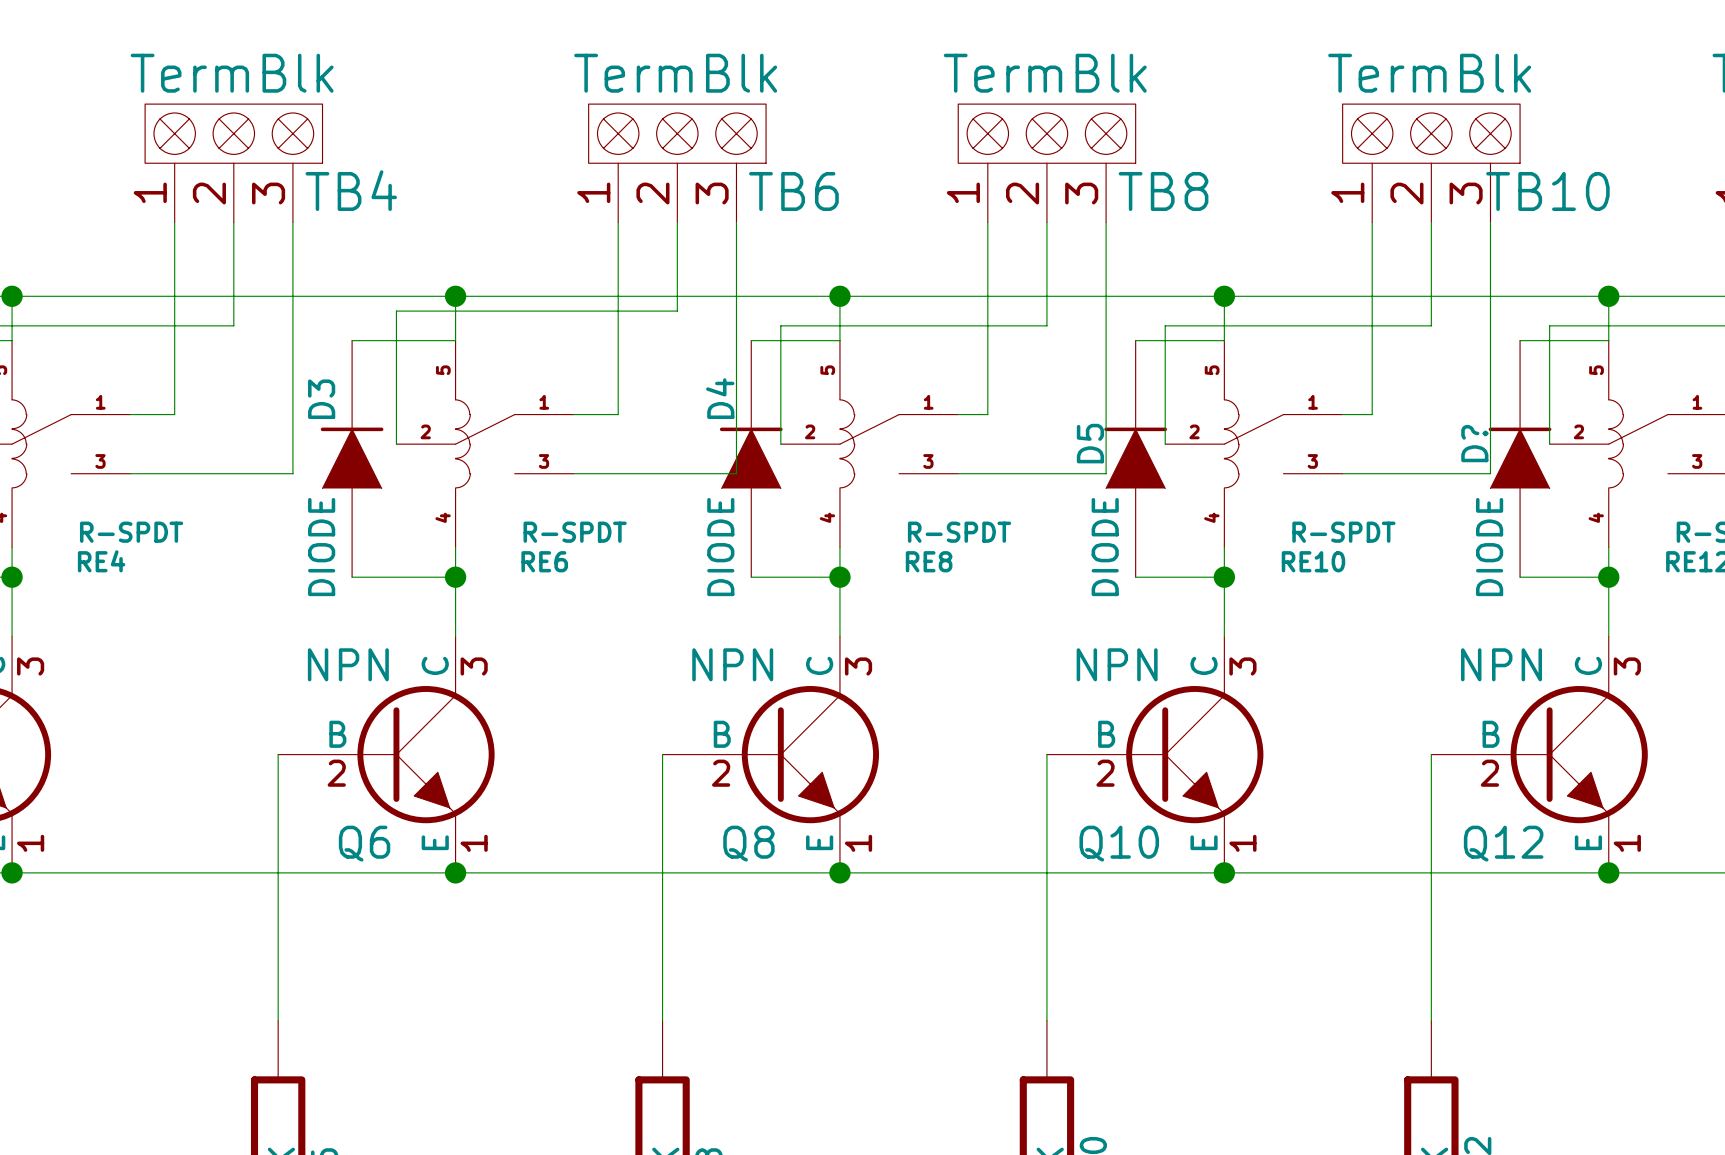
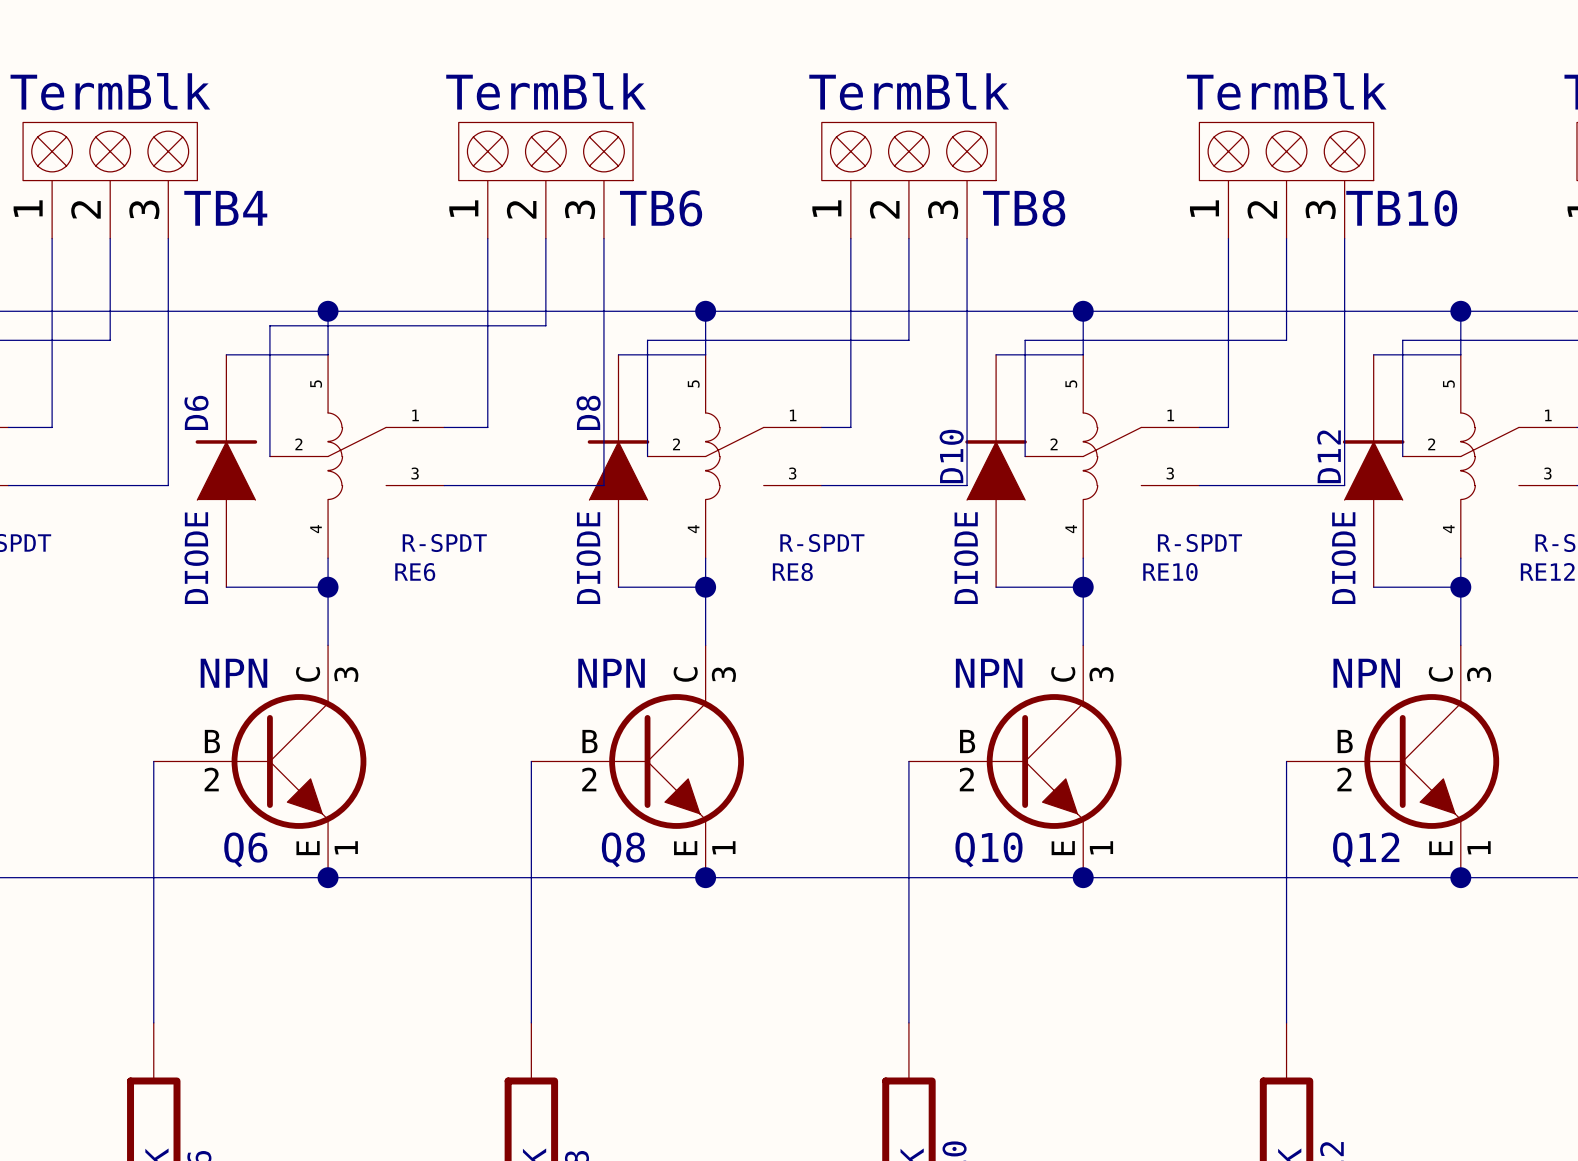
D4 name: D4 (720, 398) -> D8 (588, 412)
D3 name: D3 (321, 399) -> D6 (196, 412)
D5 name: D5 (1090, 443) -> D10 (951, 456)
D? name: D? (1474, 443) -> D12 (1329, 456)

